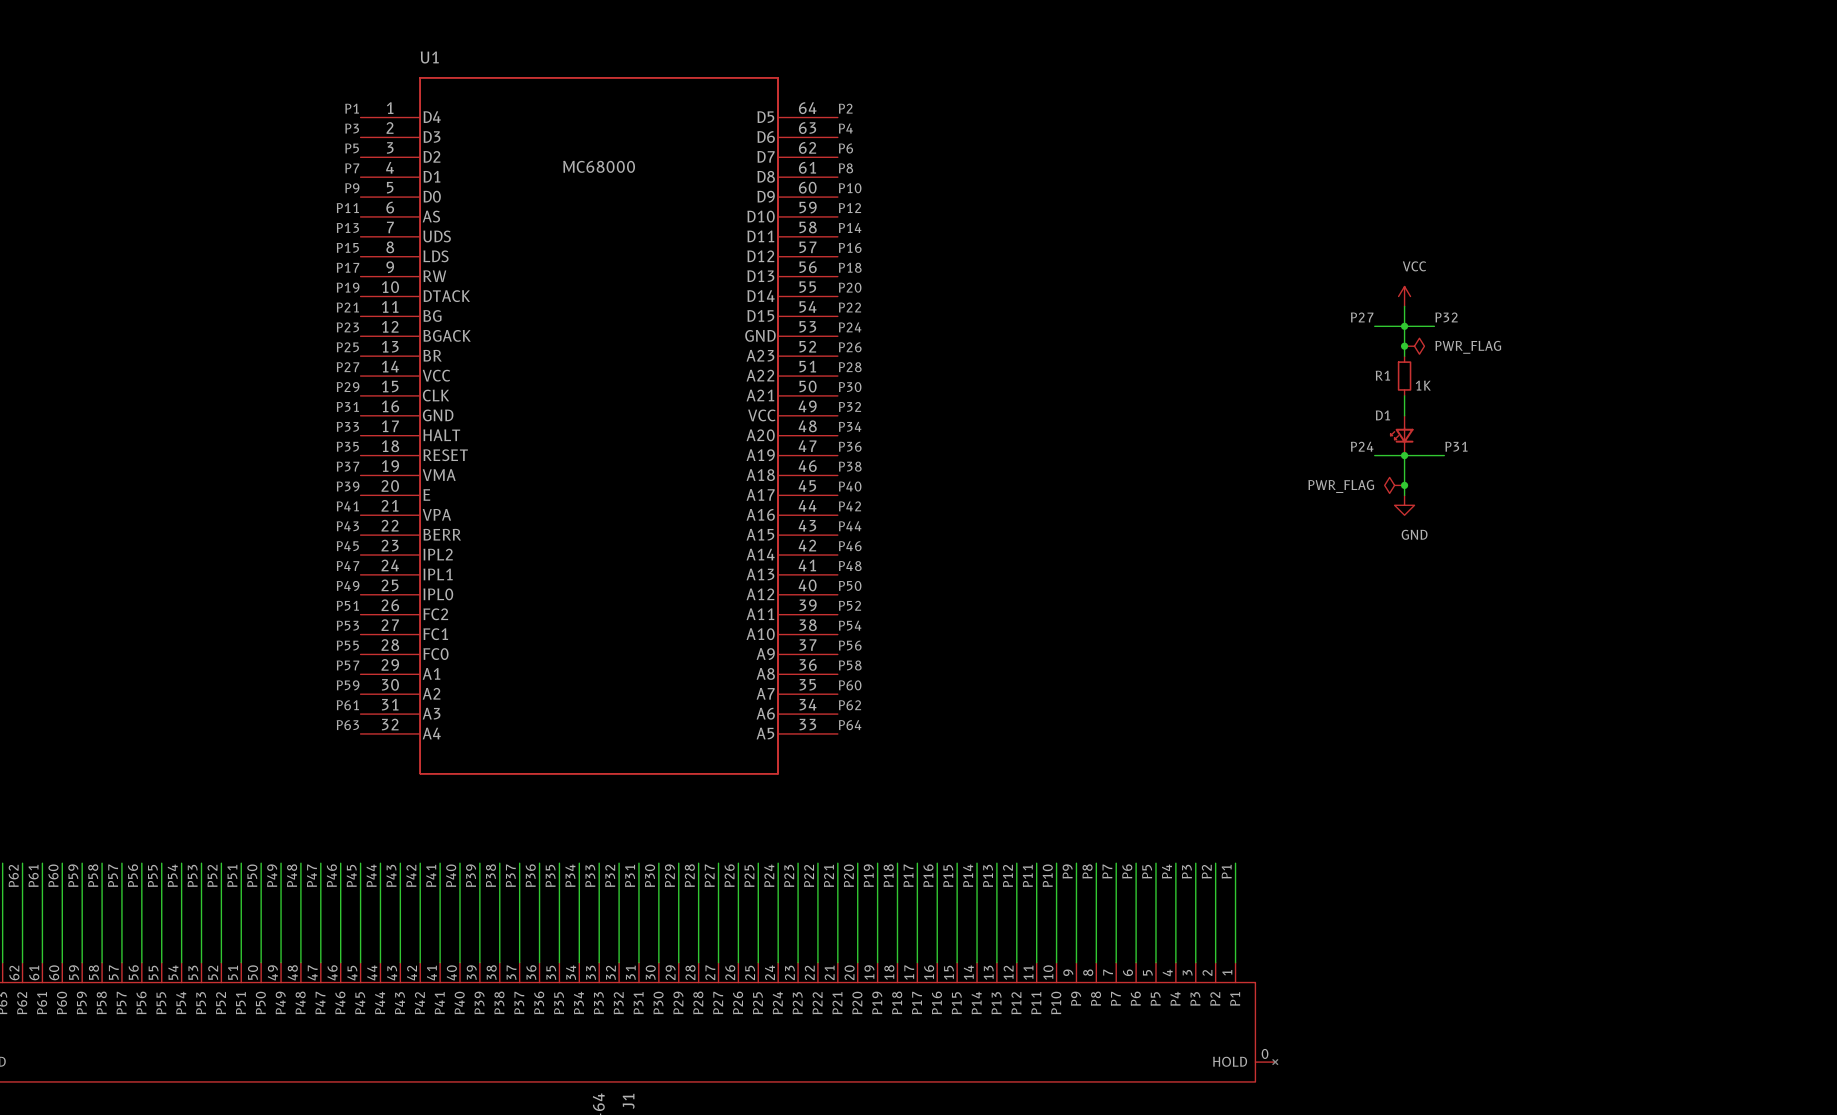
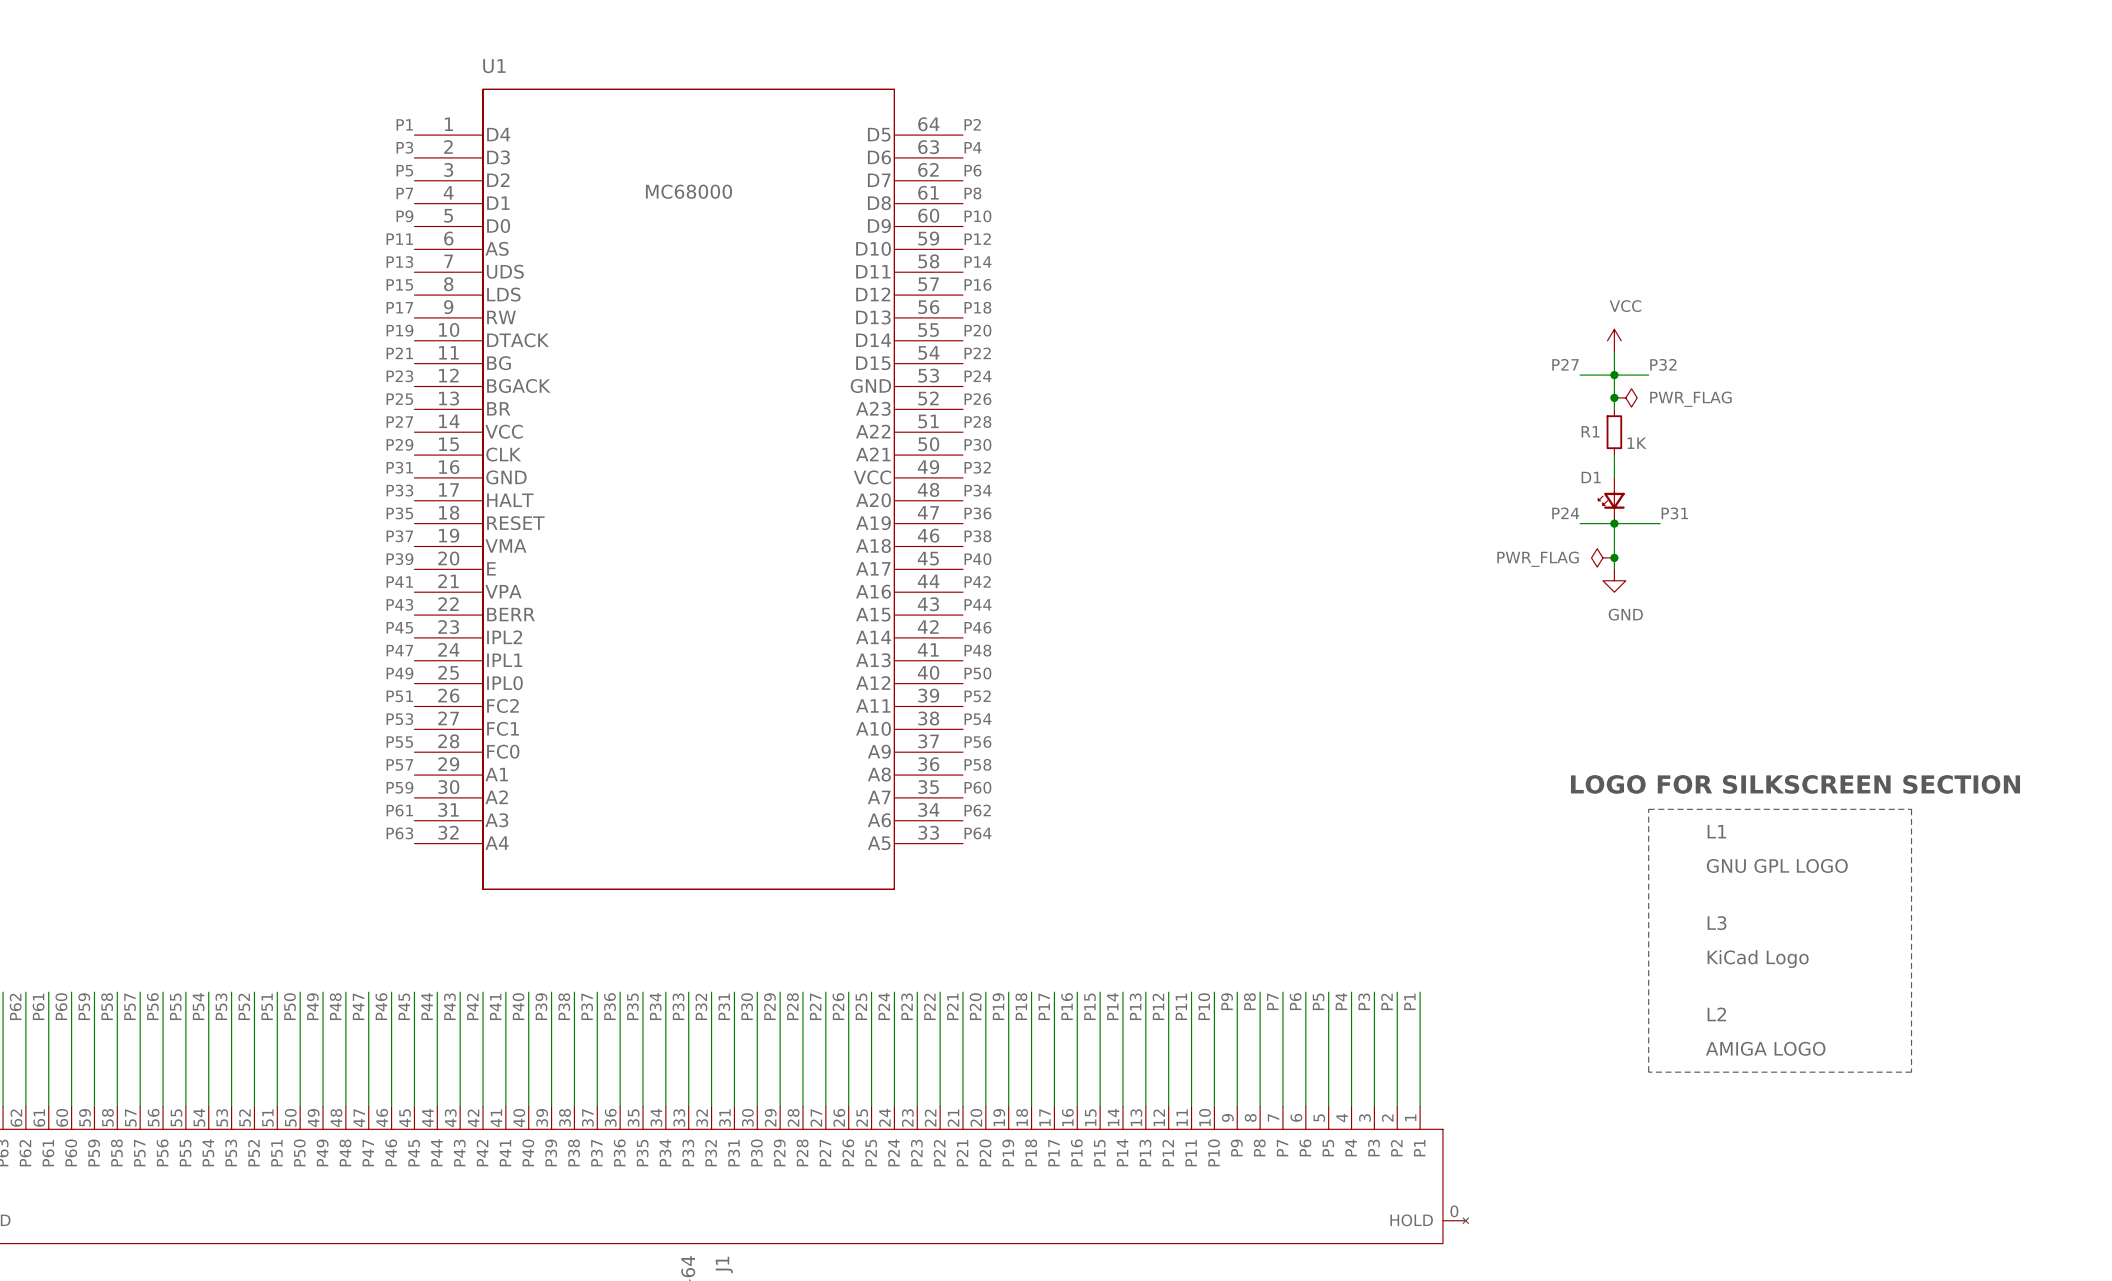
text: none -> LOGO FOR SILKSCREEN SECTION (1795, 784)
line: none -> (1648, 809) (1911, 809) (1911, 1072) (1648, 1072) (1648, 809)
L1: none -> GNU GPL LOGO (1777, 848)
L3: none -> KiCad Logo (1758, 942)
L2: none -> AMIGA LOGO (1765, 1031)

